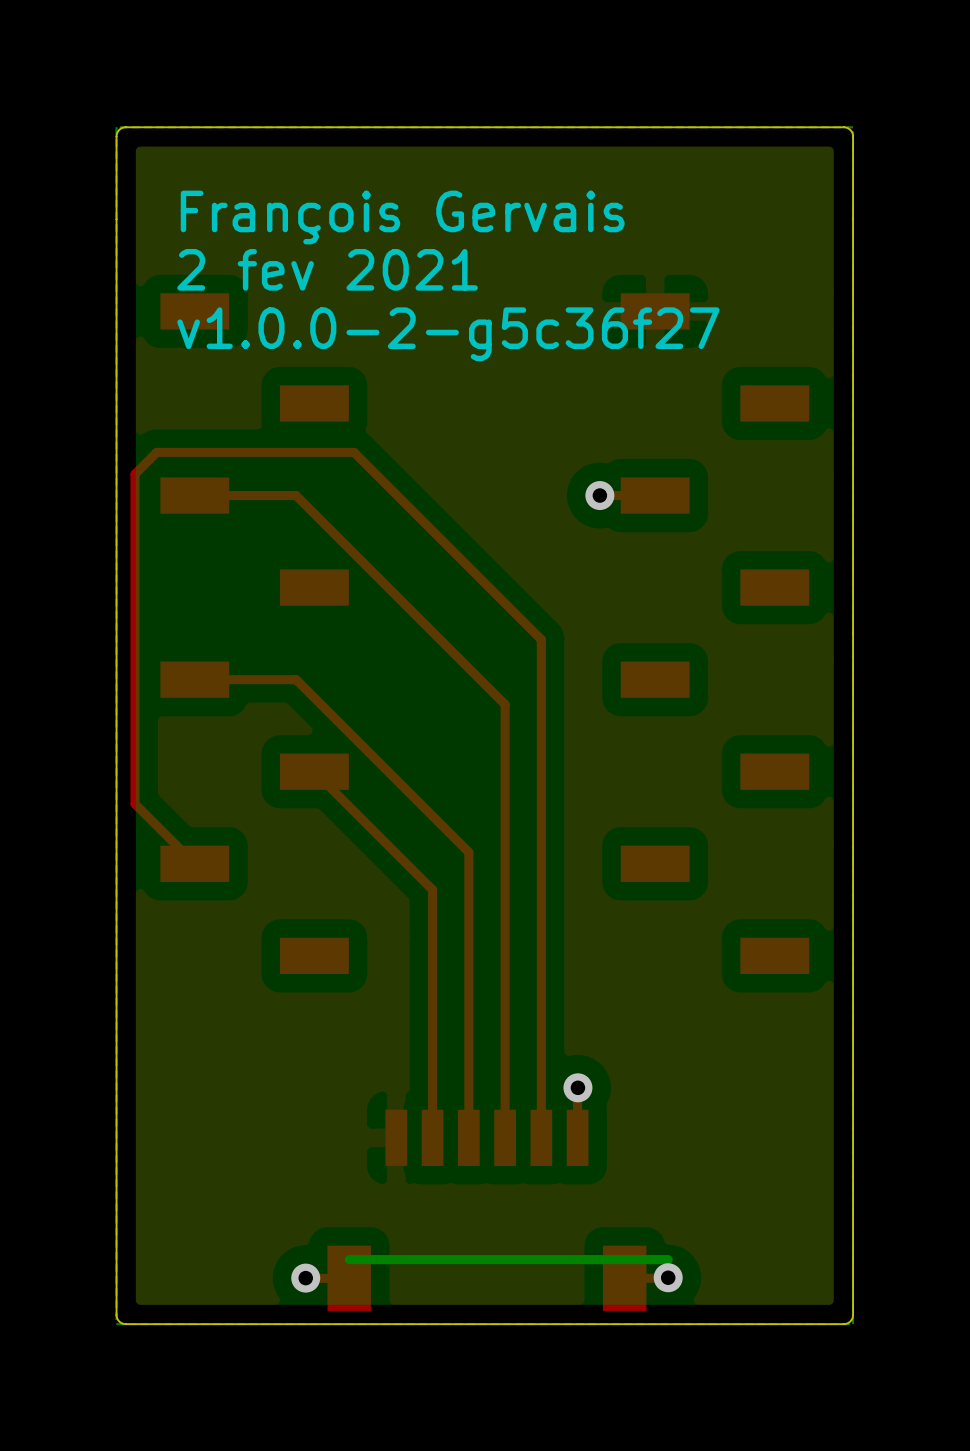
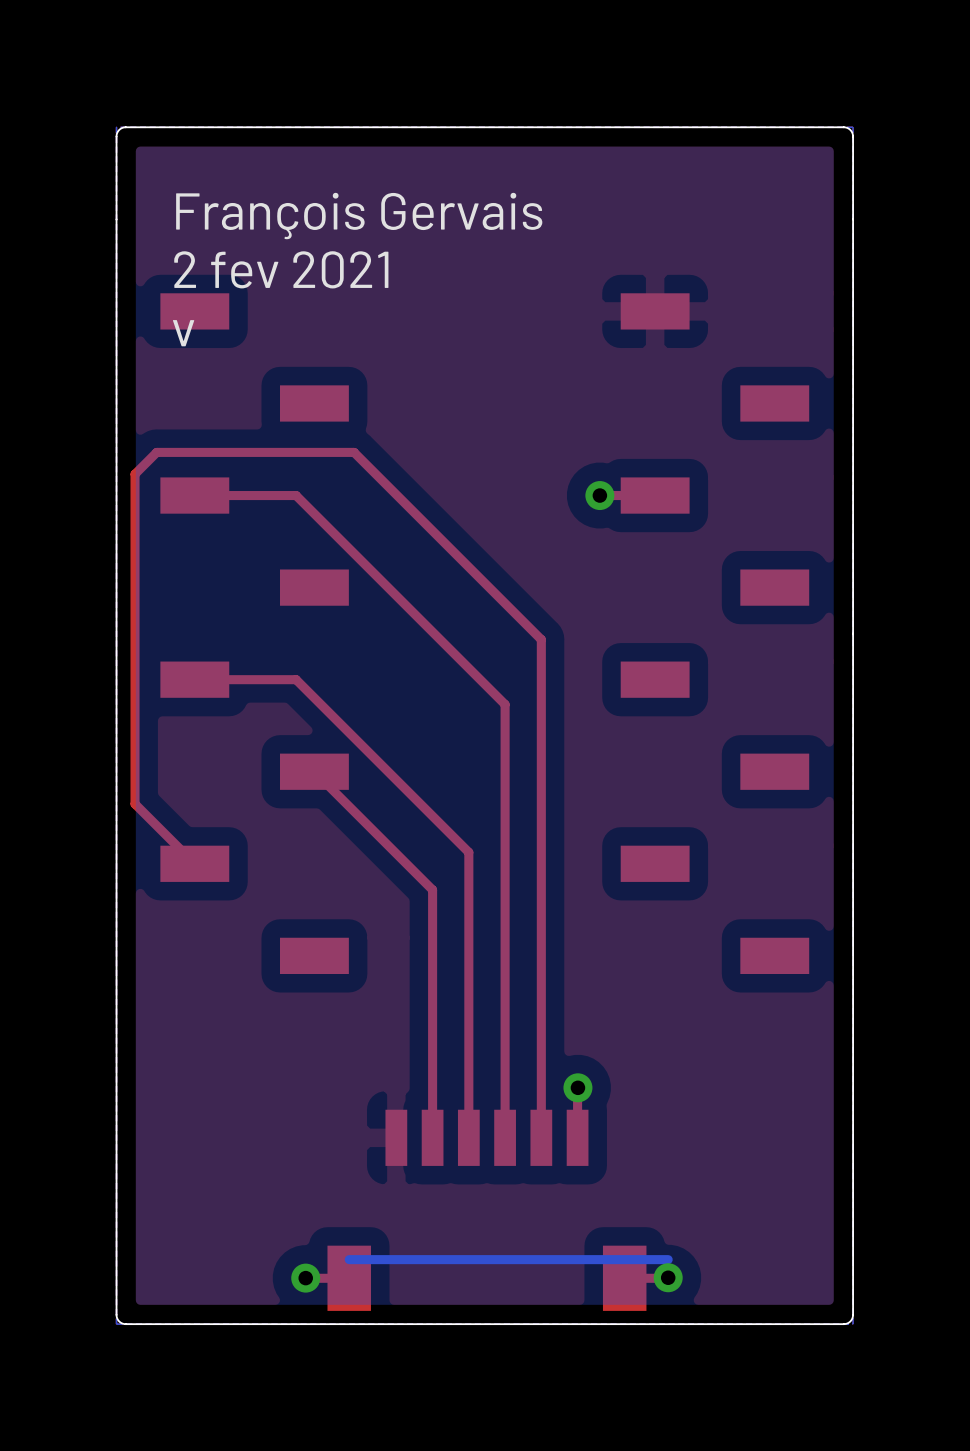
text: v1.0.0-2-g5c36f27 (448, 334) -> v (183, 333)

